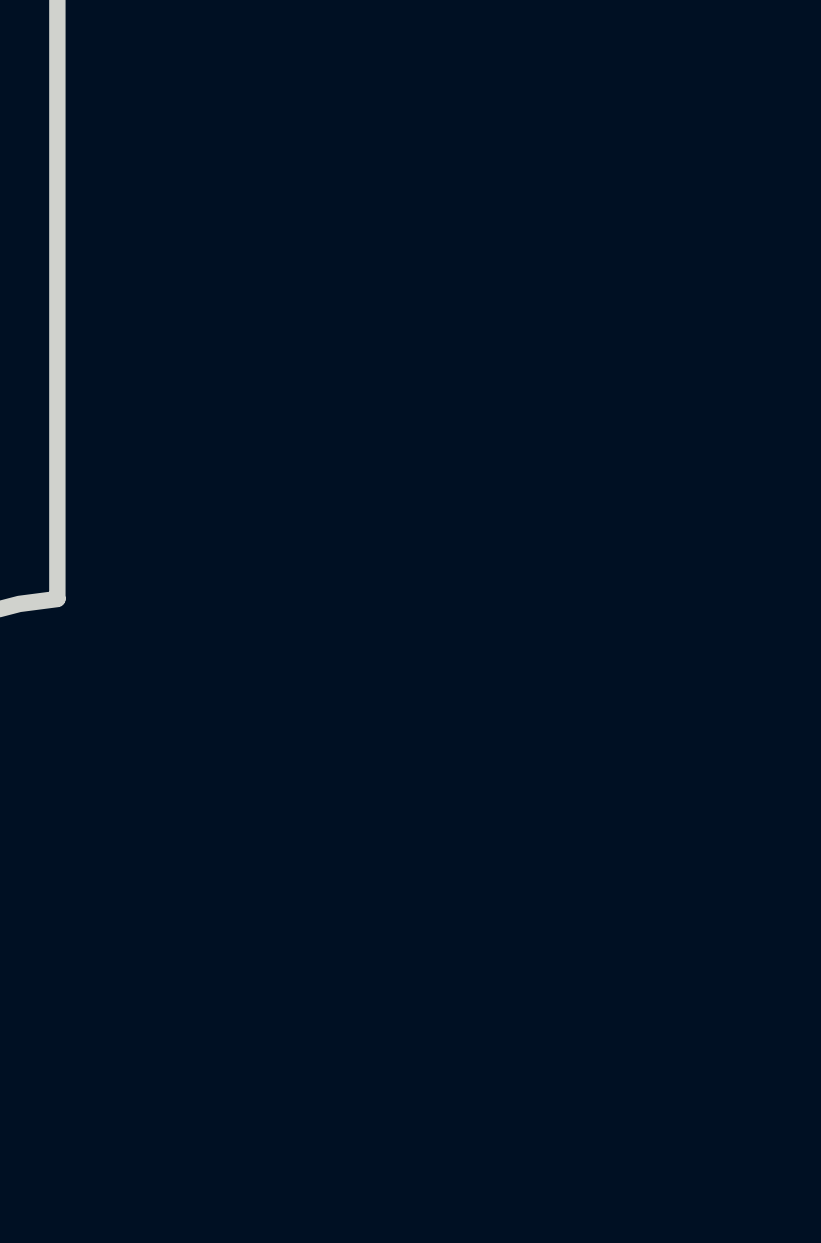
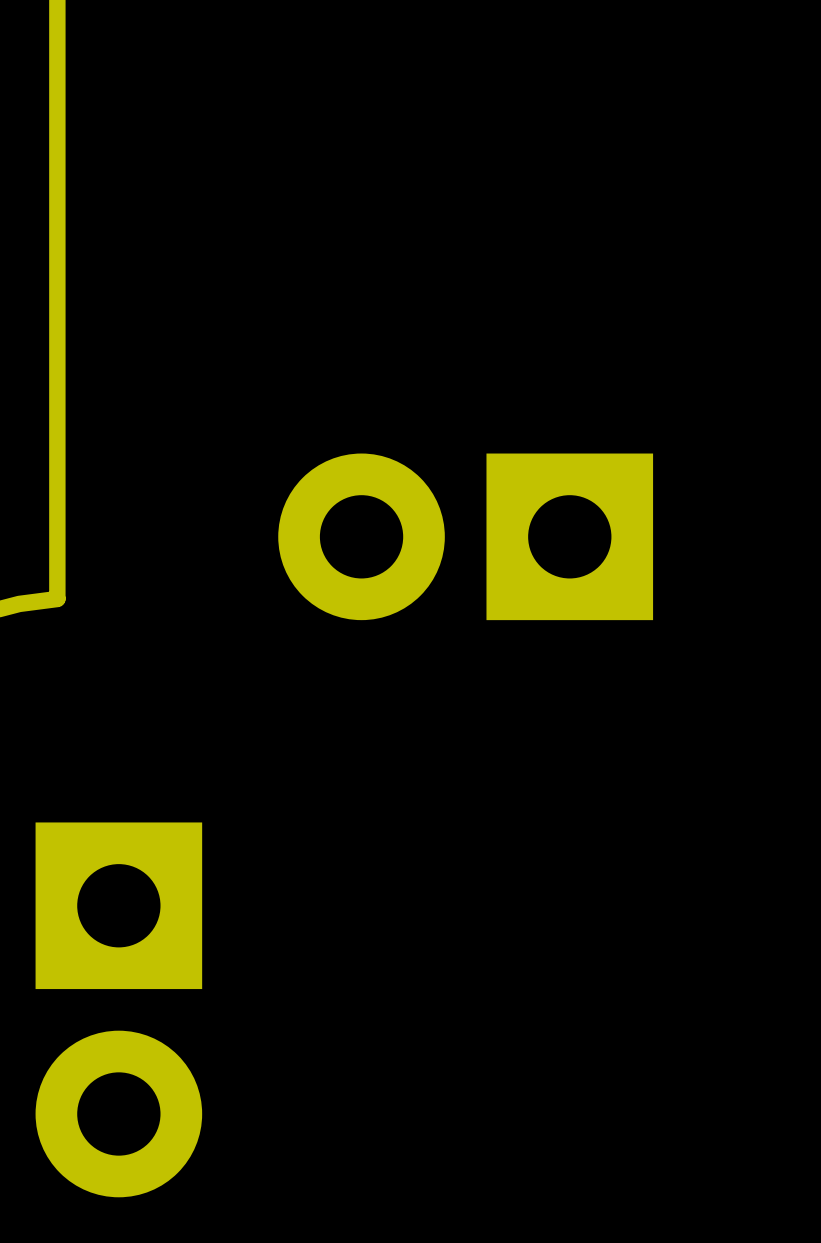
part: none -> (465, 536)
part: none -> (118, 1009)

